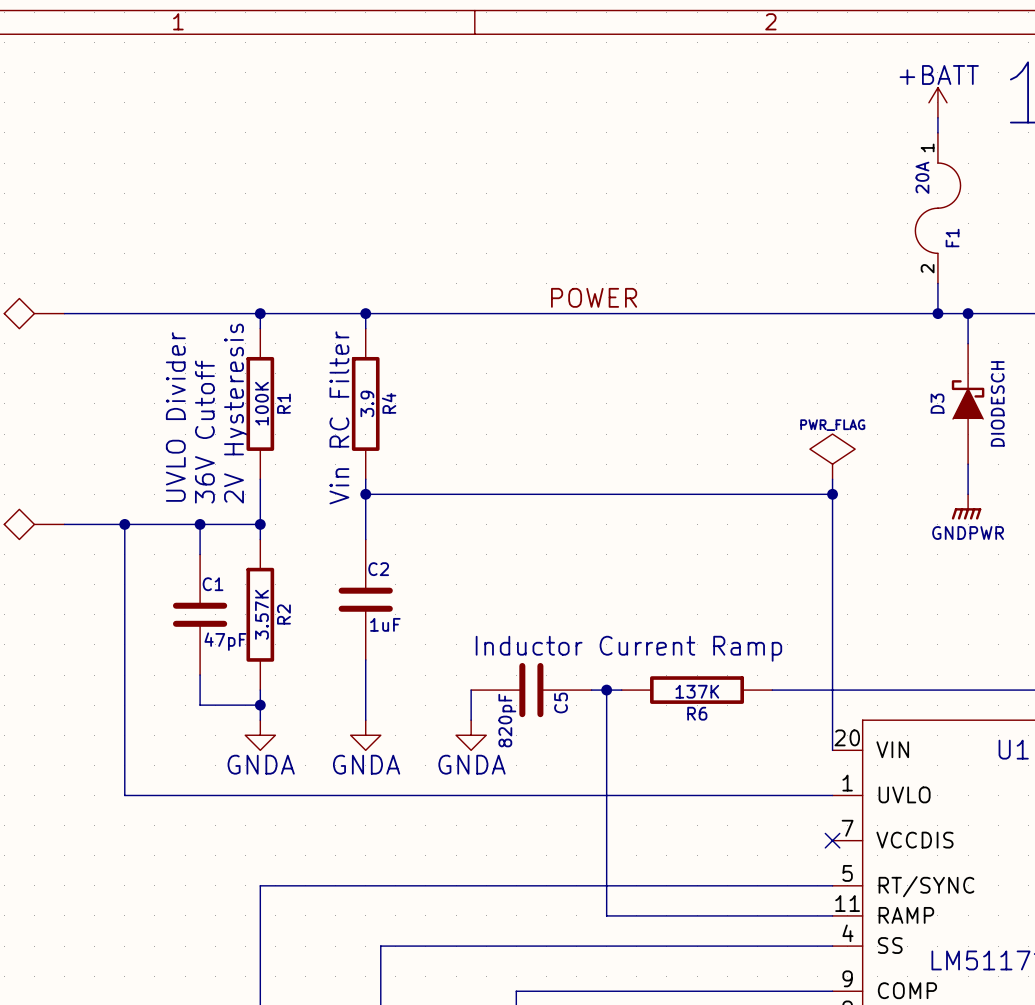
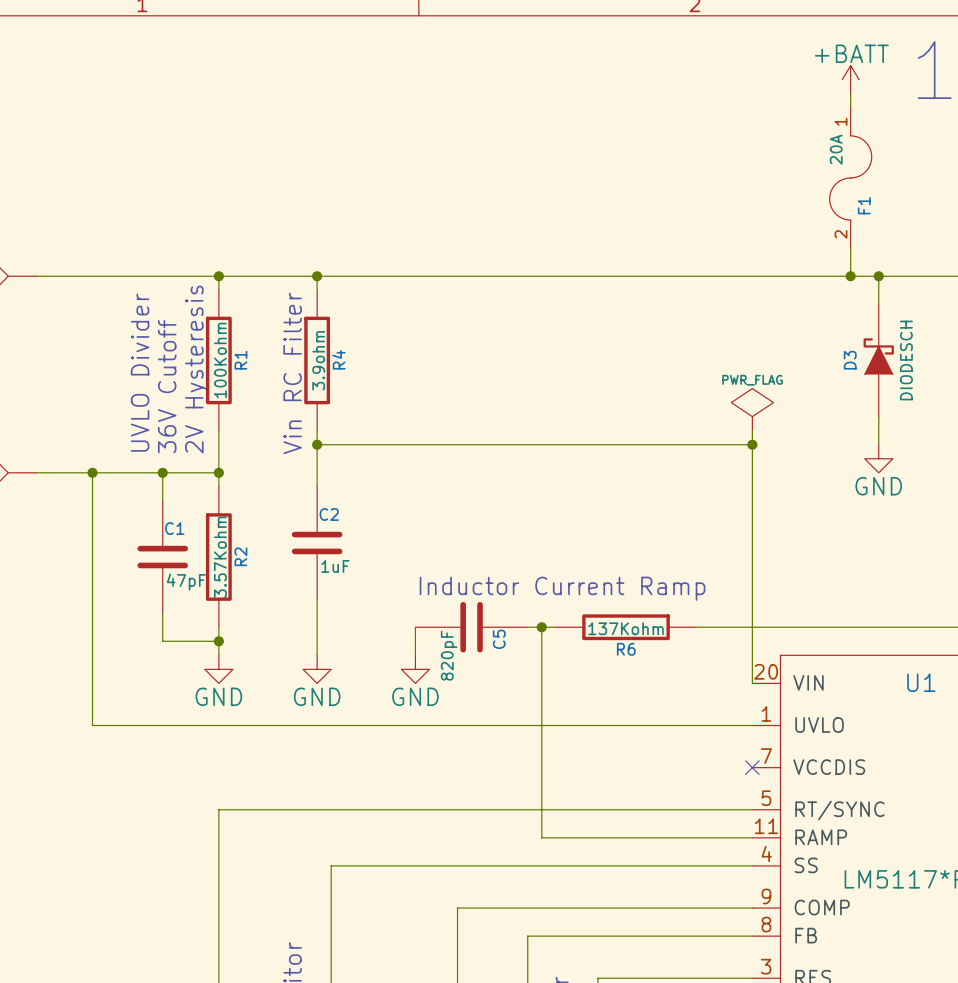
label: POWER (594, 297) -> none
R1 value: 100K (261, 403) -> 100Kohm (220, 360)
R4 value: 3.9 (367, 403) -> 3.9ohm (318, 360)
power symbol: GNDPWR (966, 506) -> GND (878, 458)
R2 value: 3.57K (261, 614) -> 3.57Kohm (220, 557)
R6 value: 137K (697, 691) -> 137Kohm (626, 628)
power symbol: GNDA (260, 735) -> GND (218, 669)
power symbol: GNDA (365, 735) -> GND (317, 669)
power symbol: GNDA (471, 735) -> GND (415, 669)

